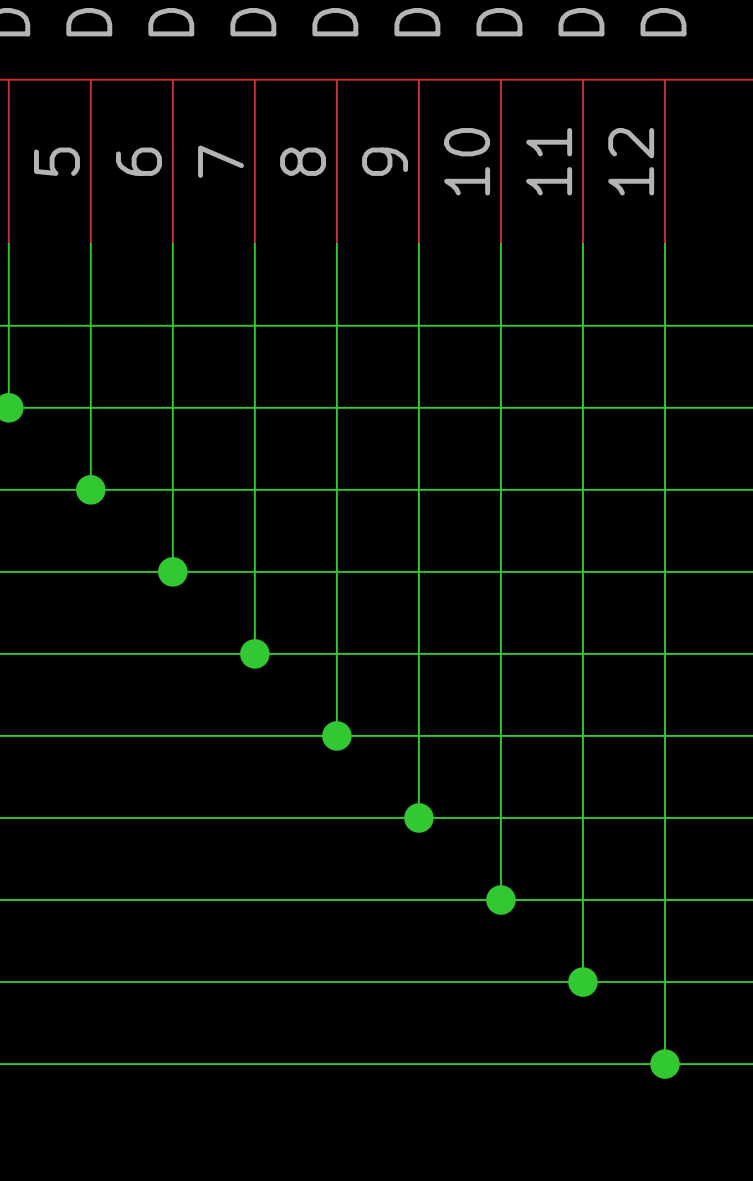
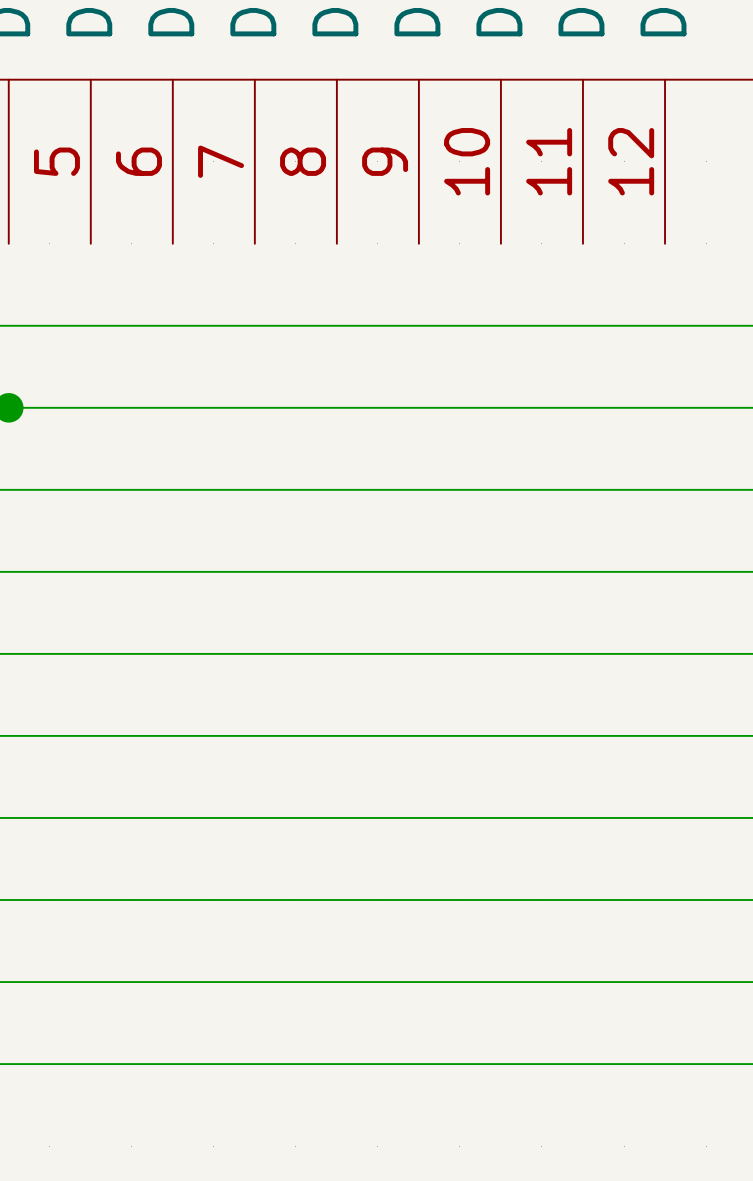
wire: (8, 243) (8, 407) -> none
wire: (90, 243) (90, 489) -> none
wire: (172, 243) (172, 571) -> none
wire: (254, 243) (254, 653) -> none
wire: (336, 243) (336, 735) -> none
wire: (418, 243) (418, 817) -> none
wire: (500, 243) (500, 900) -> none
wire: (582, 243) (582, 982) -> none
wire: (665, 243) (665, 1064) -> none
junction: (90, 489) -> none
junction: (172, 571) -> none
junction: (254, 653) -> none
junction: (336, 735) -> none
junction: (418, 817) -> none
junction: (500, 900) -> none
junction: (582, 982) -> none
junction: (665, 1064) -> none

